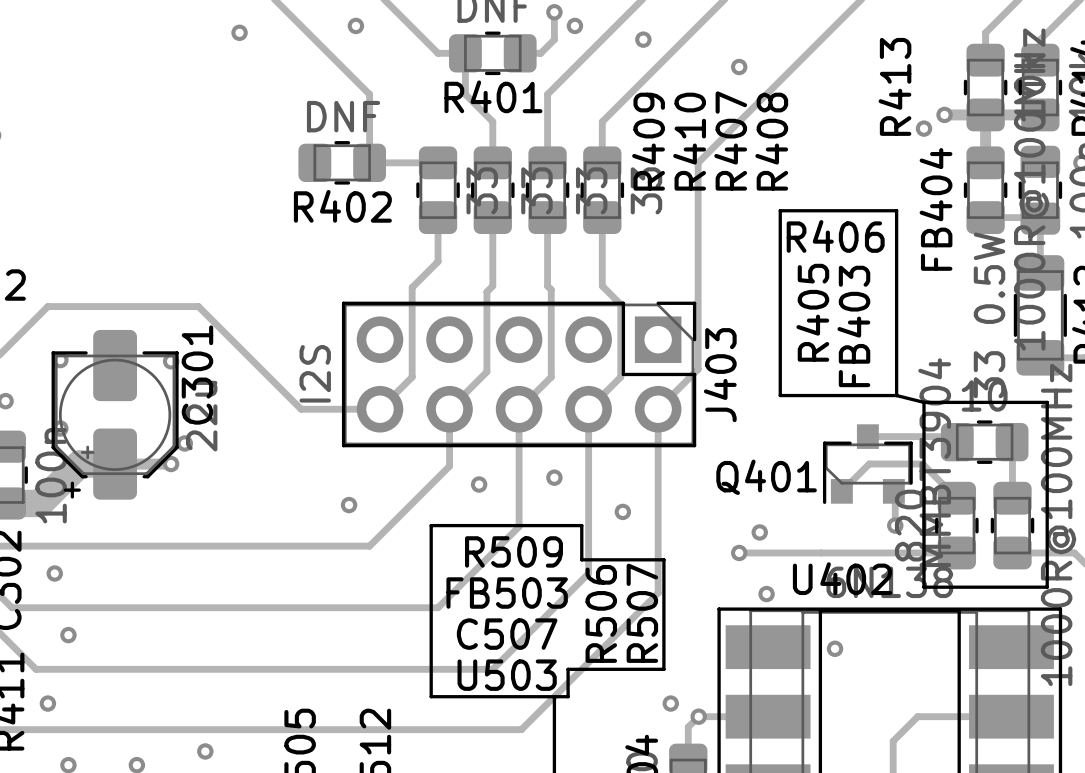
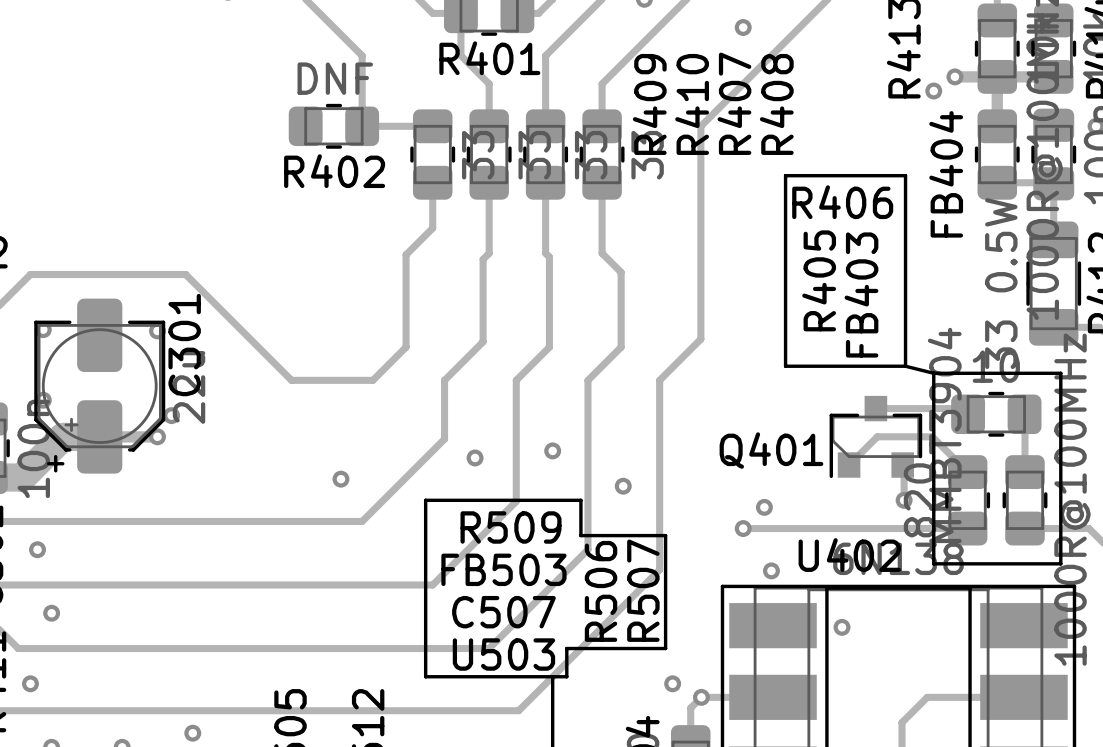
J403: I2S (519, 374) -> none

